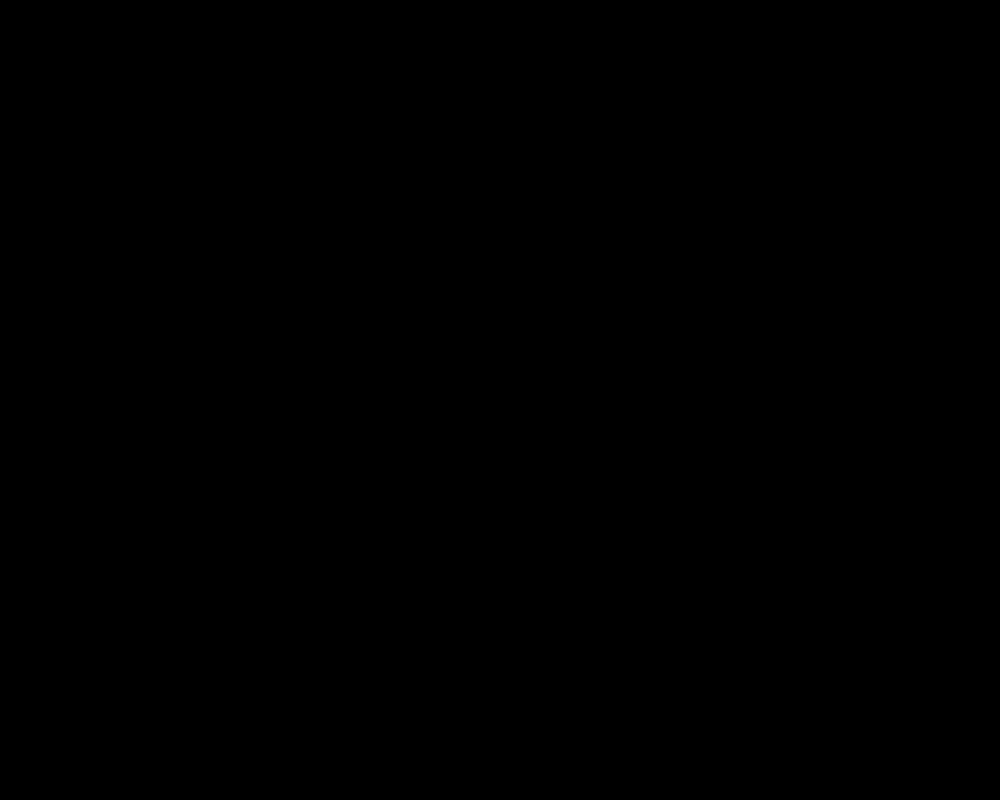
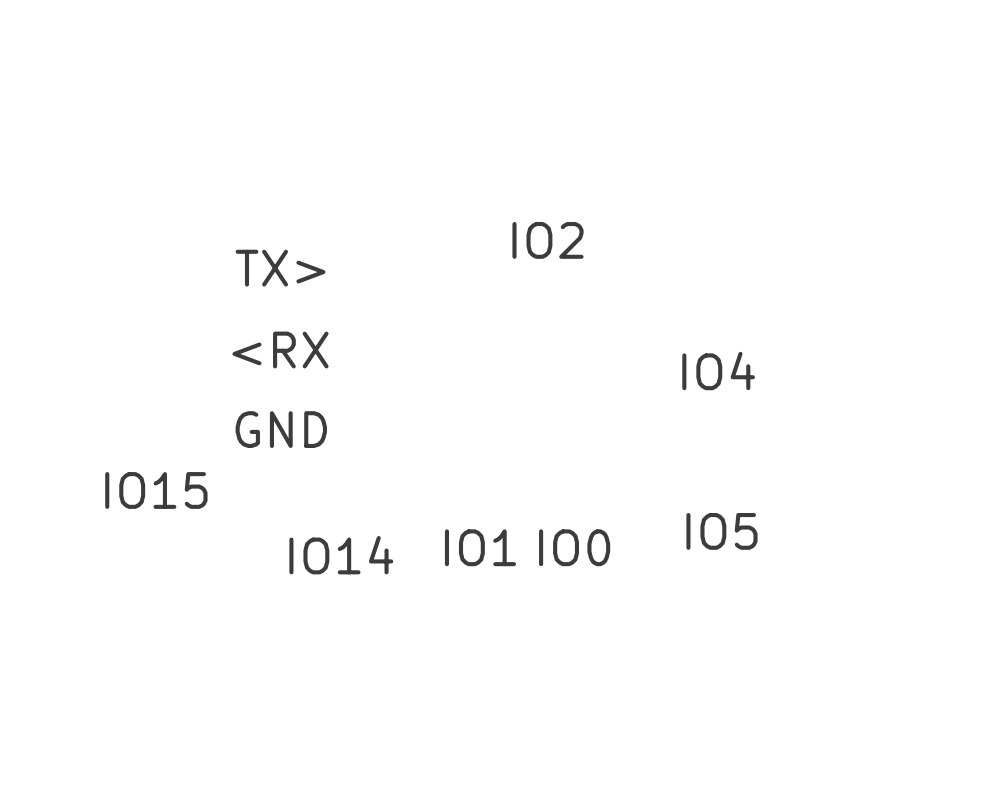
text: none -> IO2 (548, 240)
text: none -> TX> (280, 268)
text: none -> <RX (280, 350)
text: none -> IO4 (718, 371)
text: none -> GND (281, 429)
text: none -> IO15 (156, 490)
text: none -> IO5 (721, 531)
text: none -> IO1 (480, 547)
text: none -> IO0 (574, 547)
text: none -> IO14 (341, 555)

